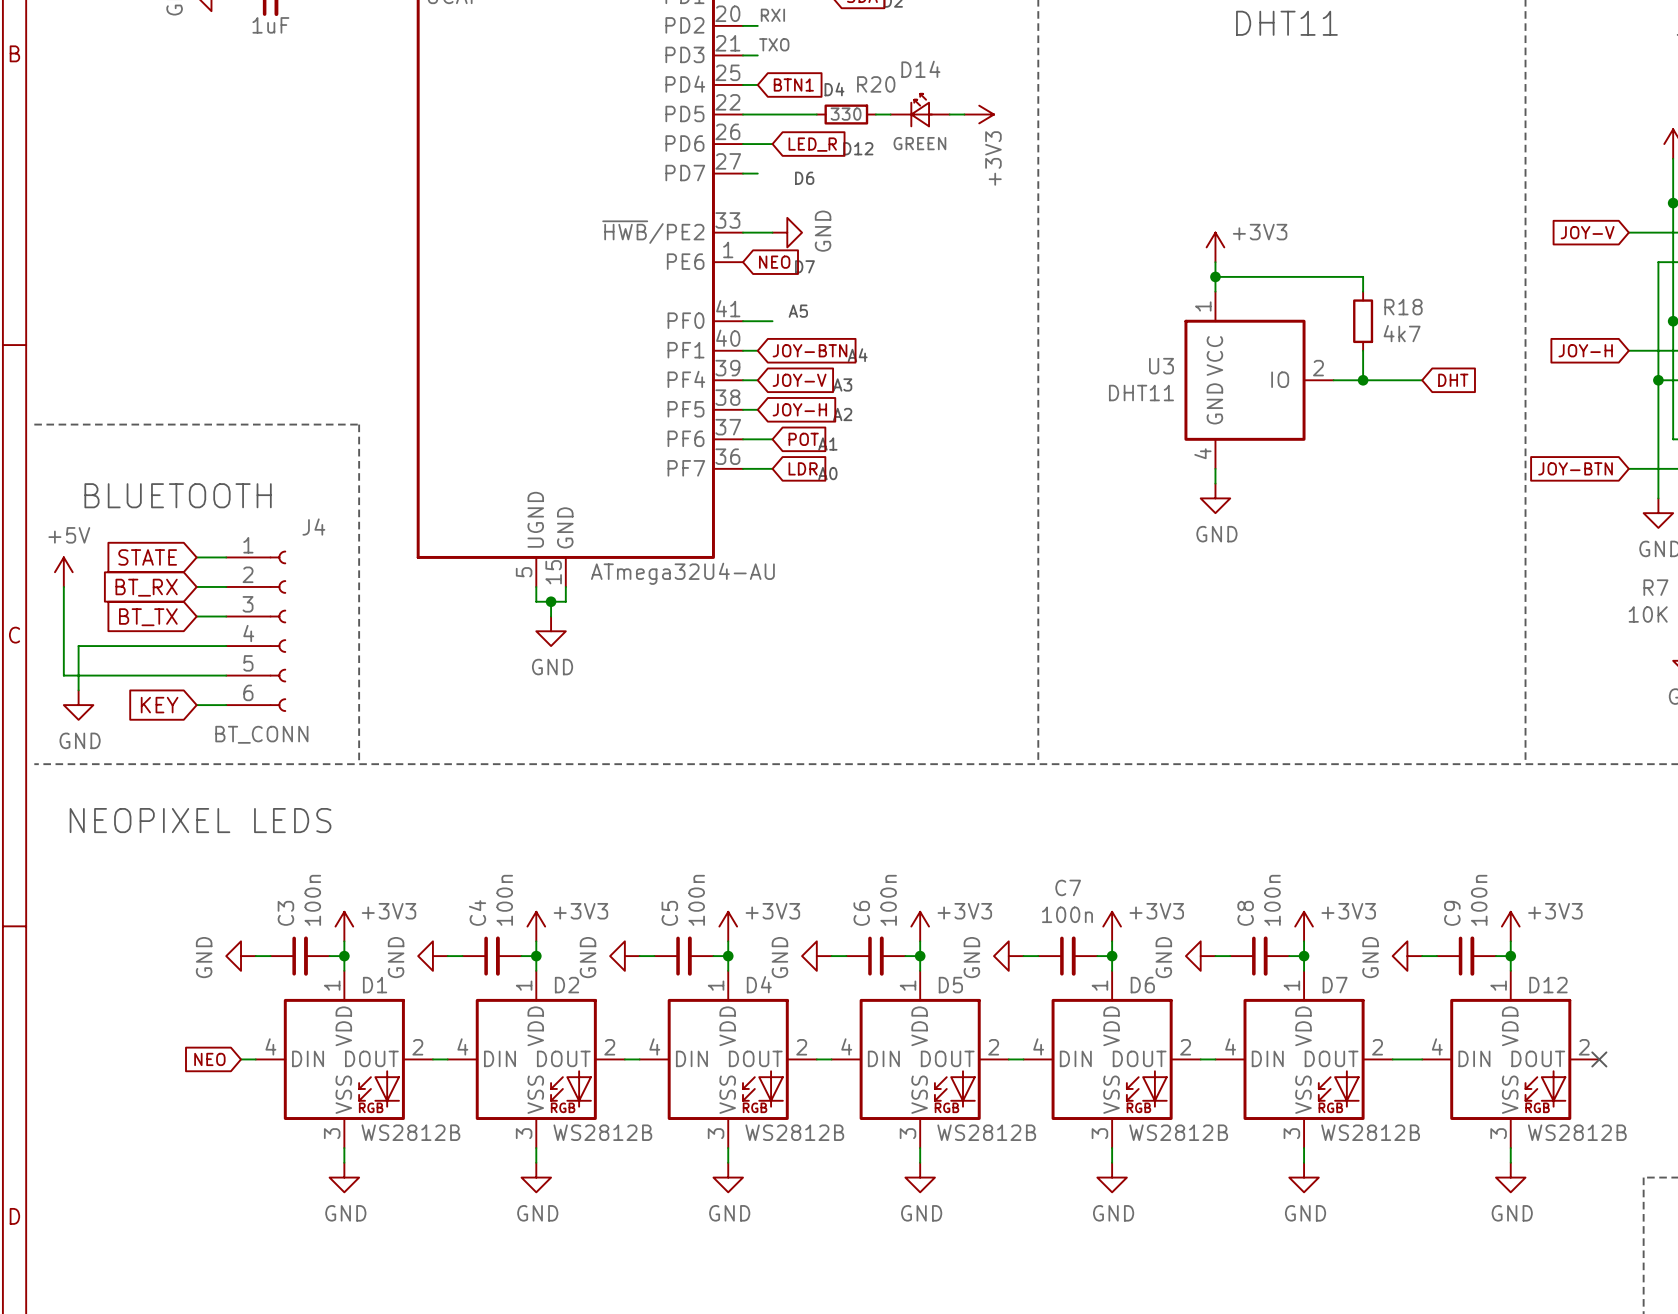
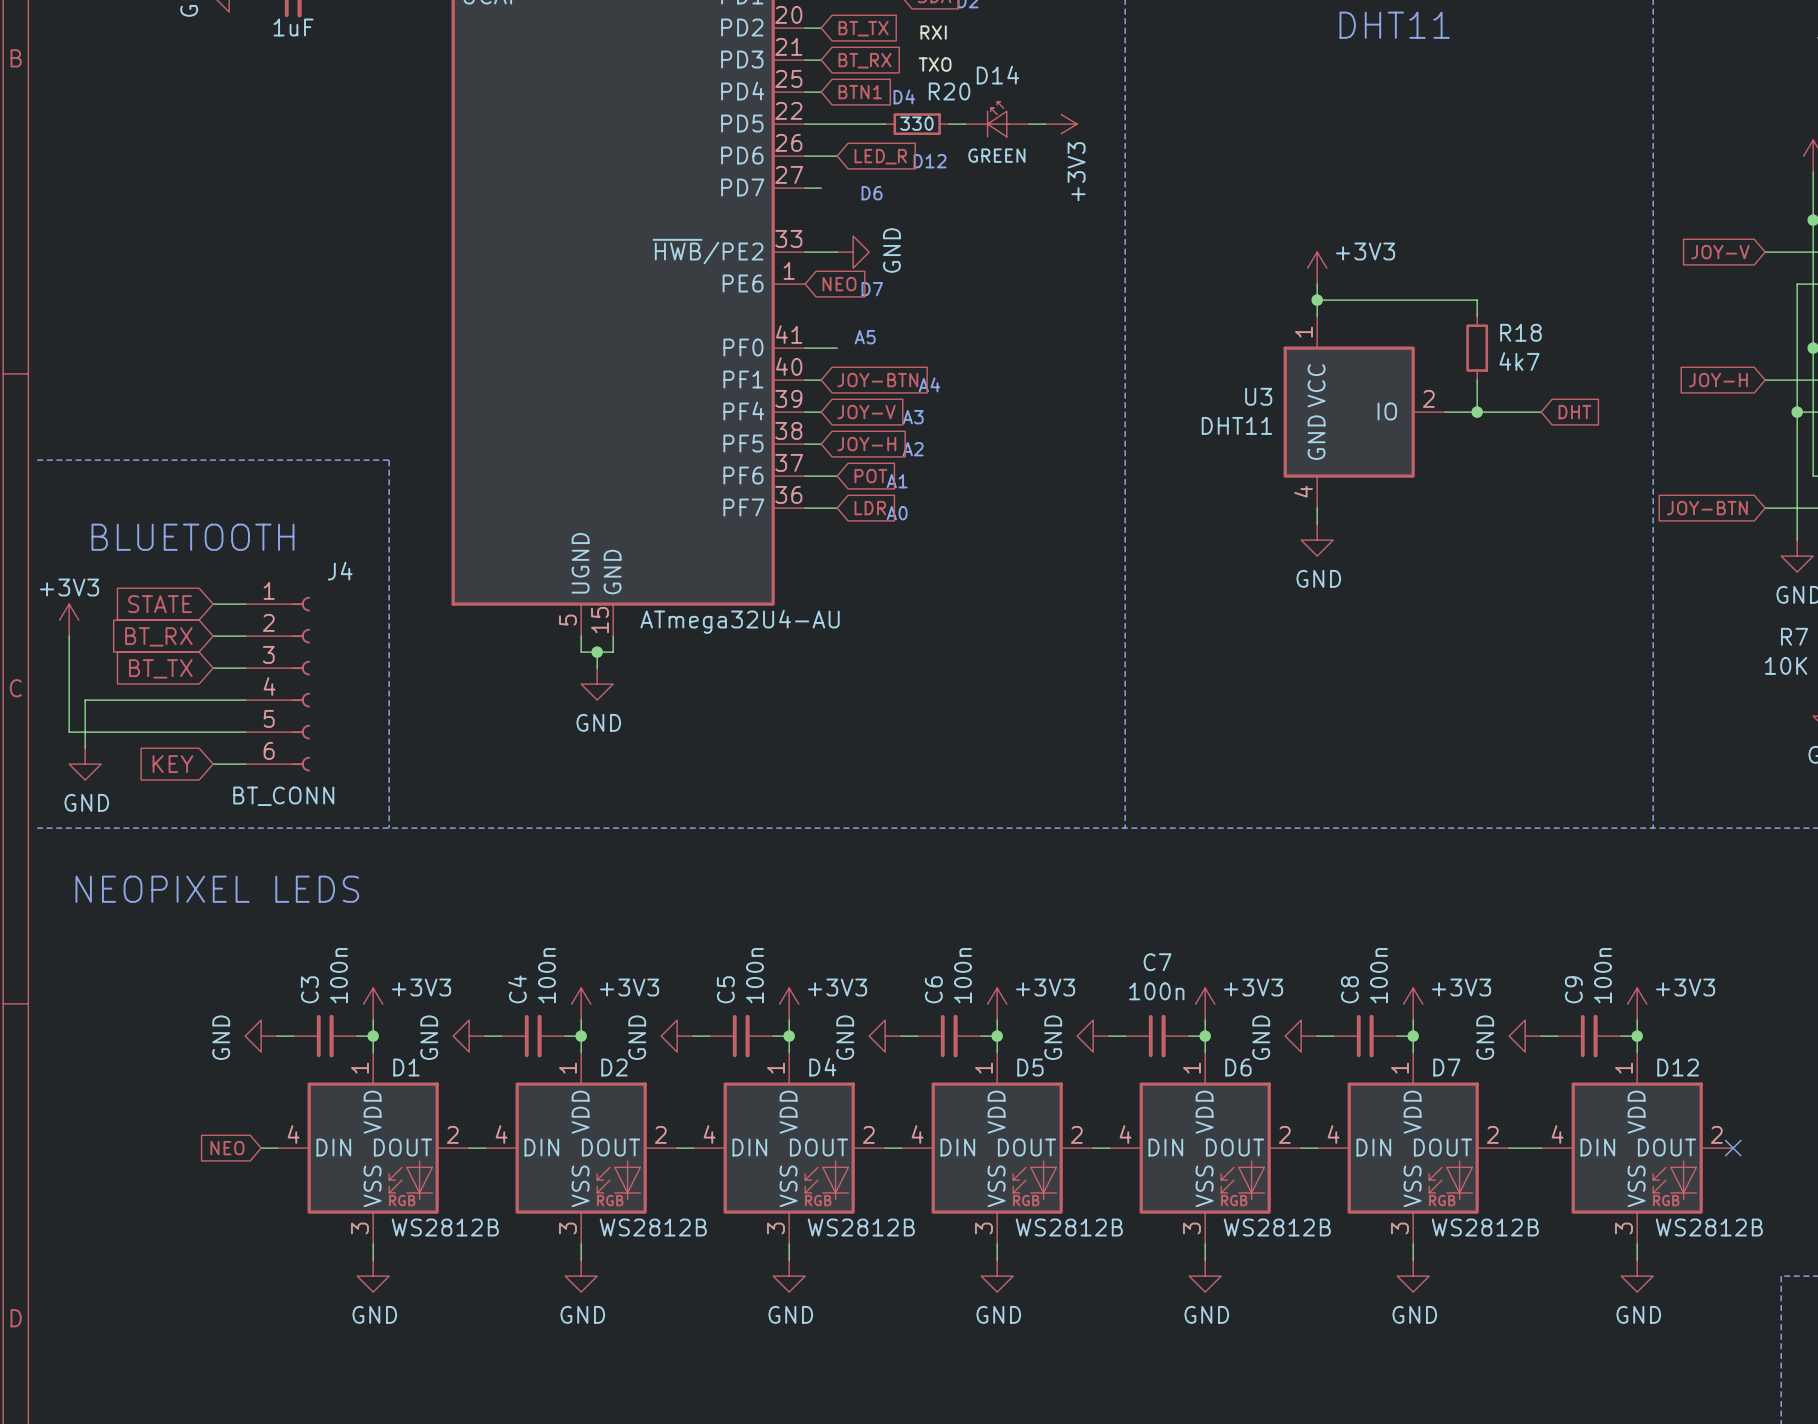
label position: RXI (772, 15) -> RXI (933, 32)
global label: none -> BT_TX (863, 28)
label position: TXO (774, 44) -> TXO (935, 64)
global label: none -> BT_RX (865, 60)
power symbol: +5V (63, 572) -> +3V3 (69, 620)

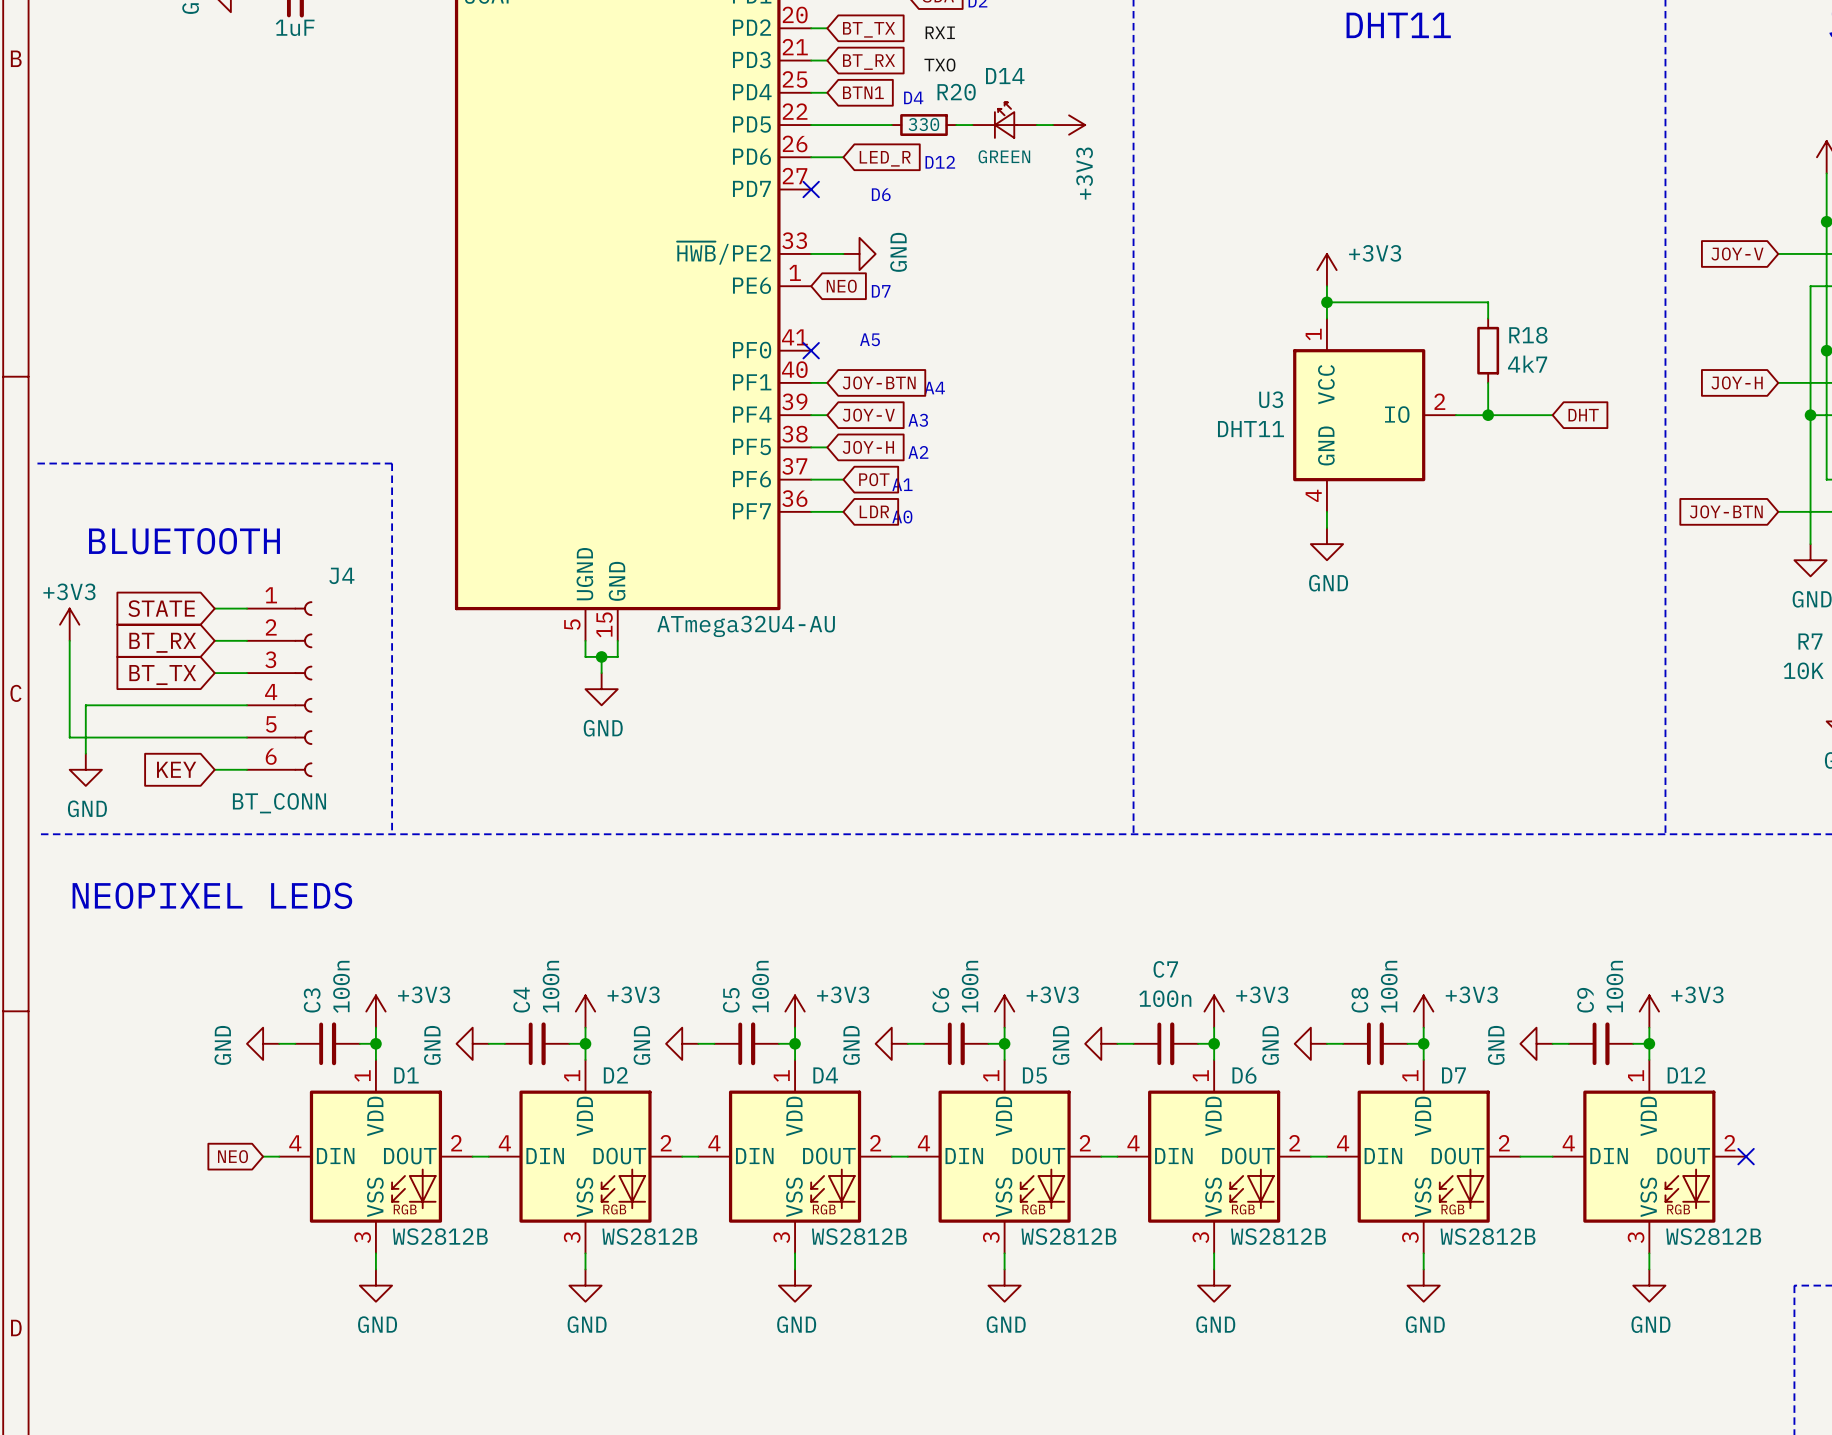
wire: (805, 188) (821, 188) -> none
no-connect mark: none -> (811, 189)
wire: (805, 348) (837, 348) -> none
no-connect mark: none -> (811, 350)

